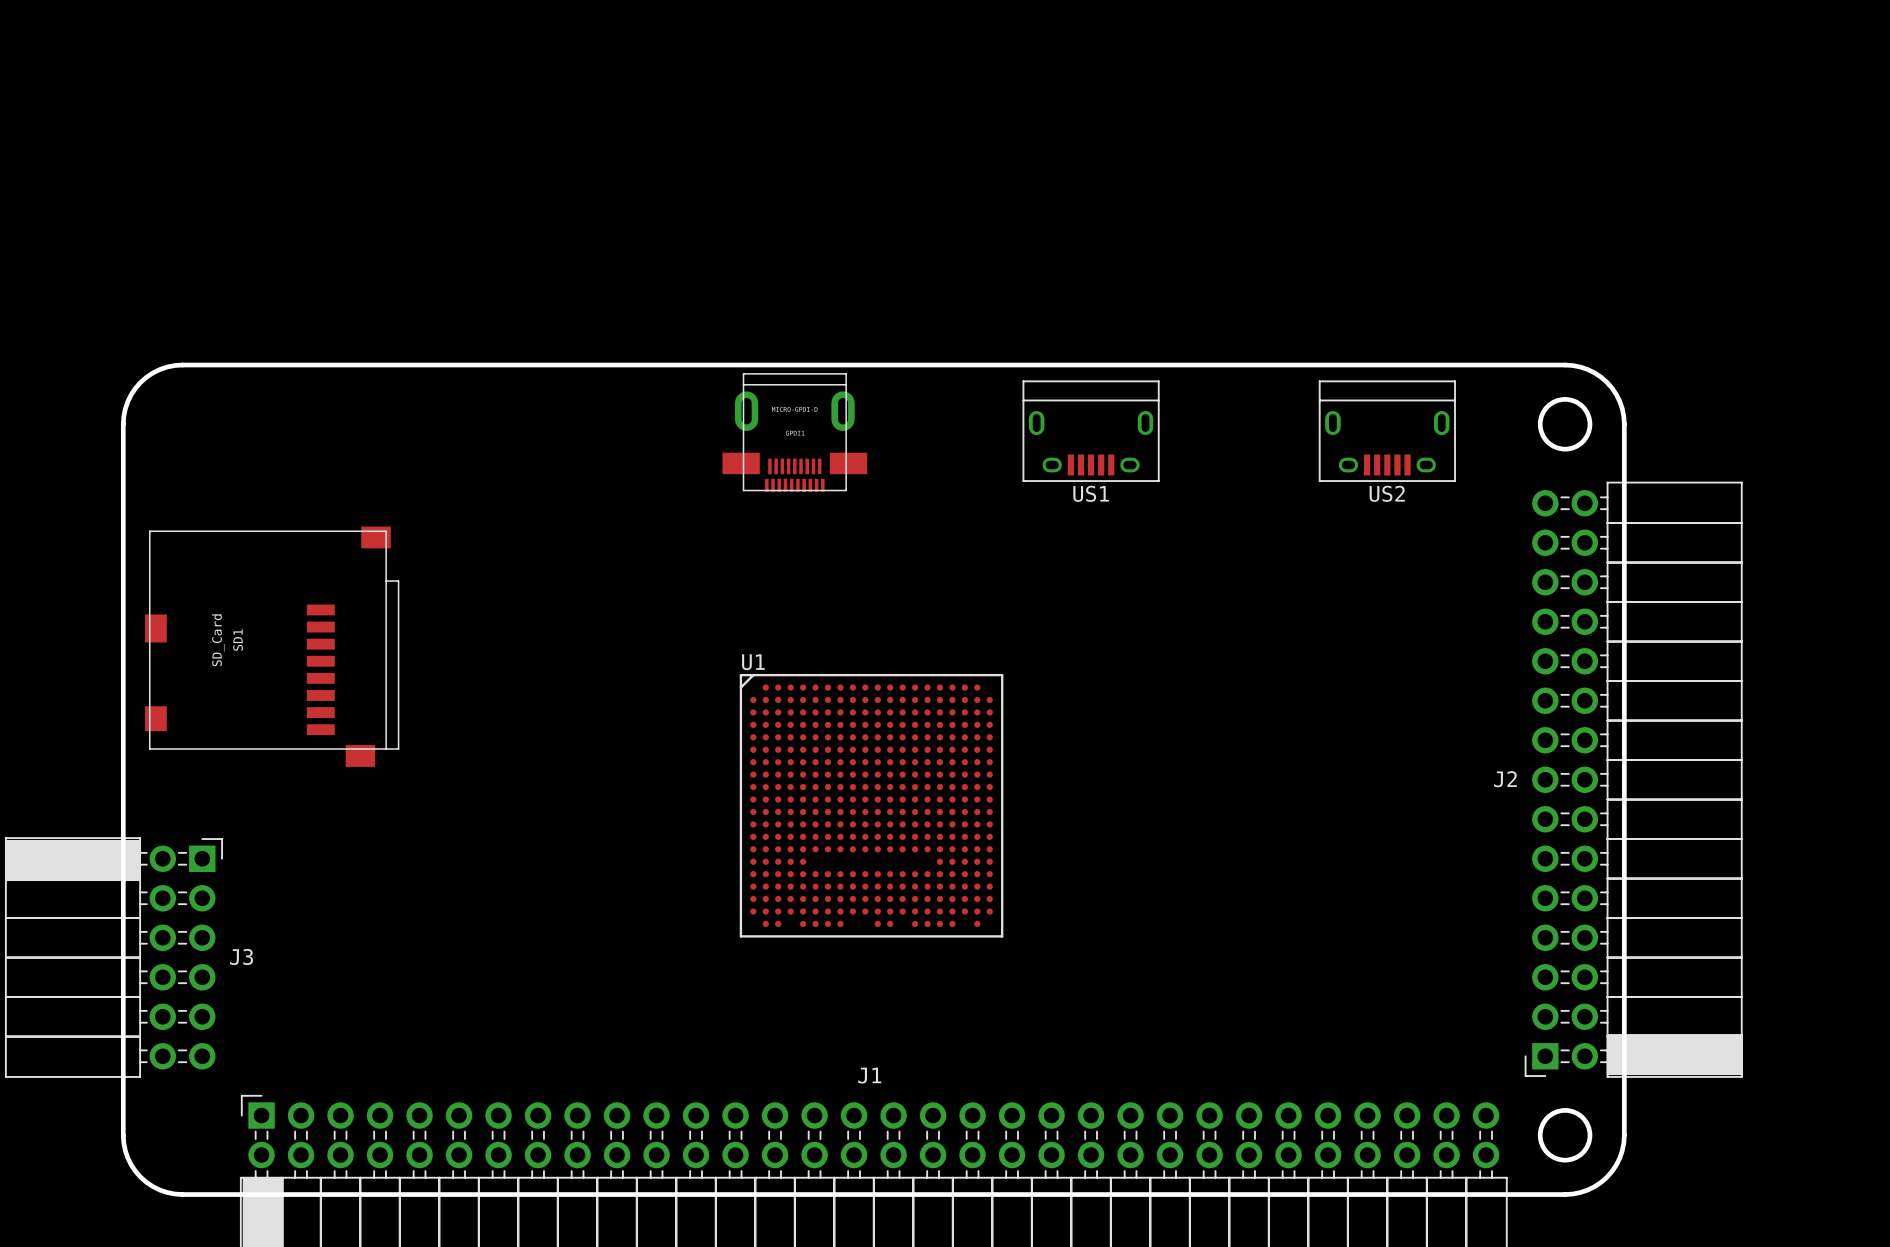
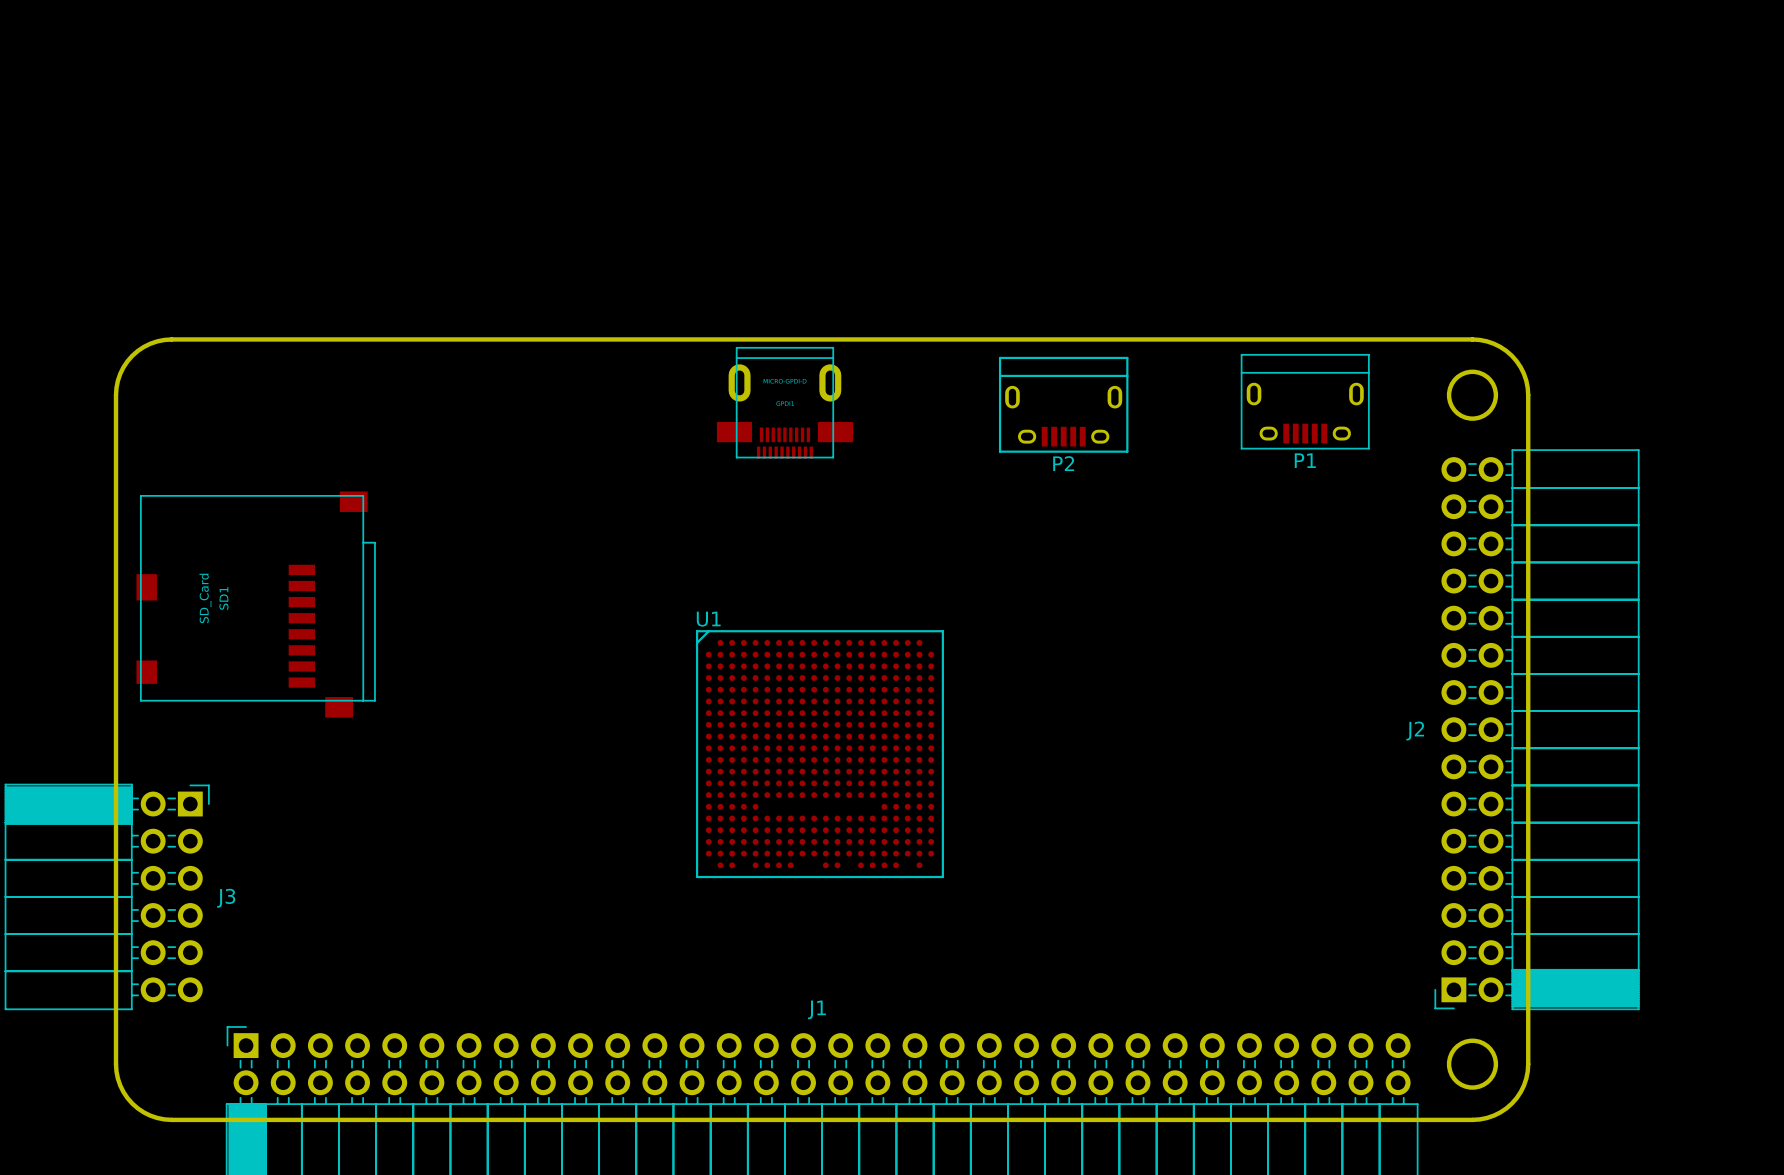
US1: (1091, 431) -> none
part position: (794, 432) -> (784, 403)
P2: none -> (1063, 404)
US2 name: US2 (1387, 493) -> P1 (1305, 460)

